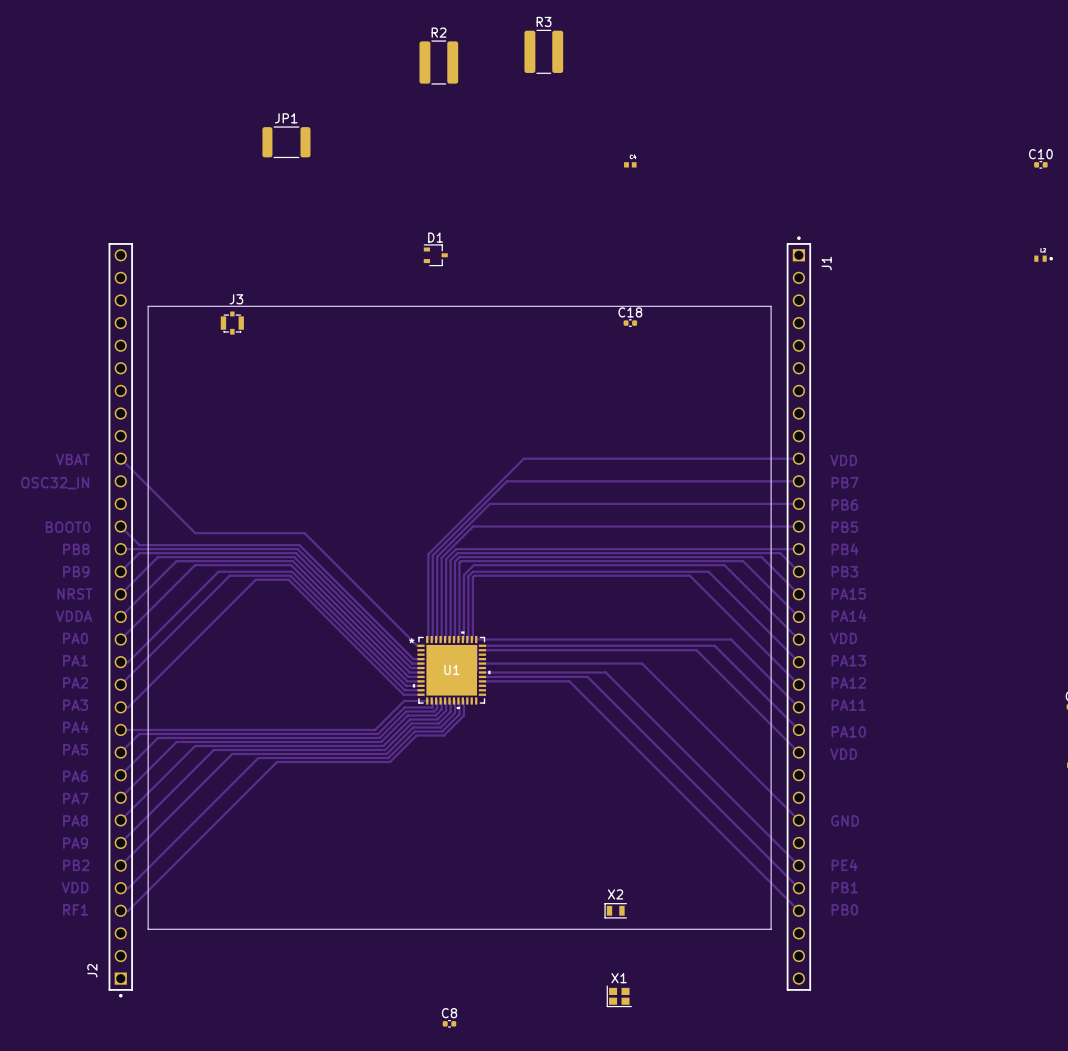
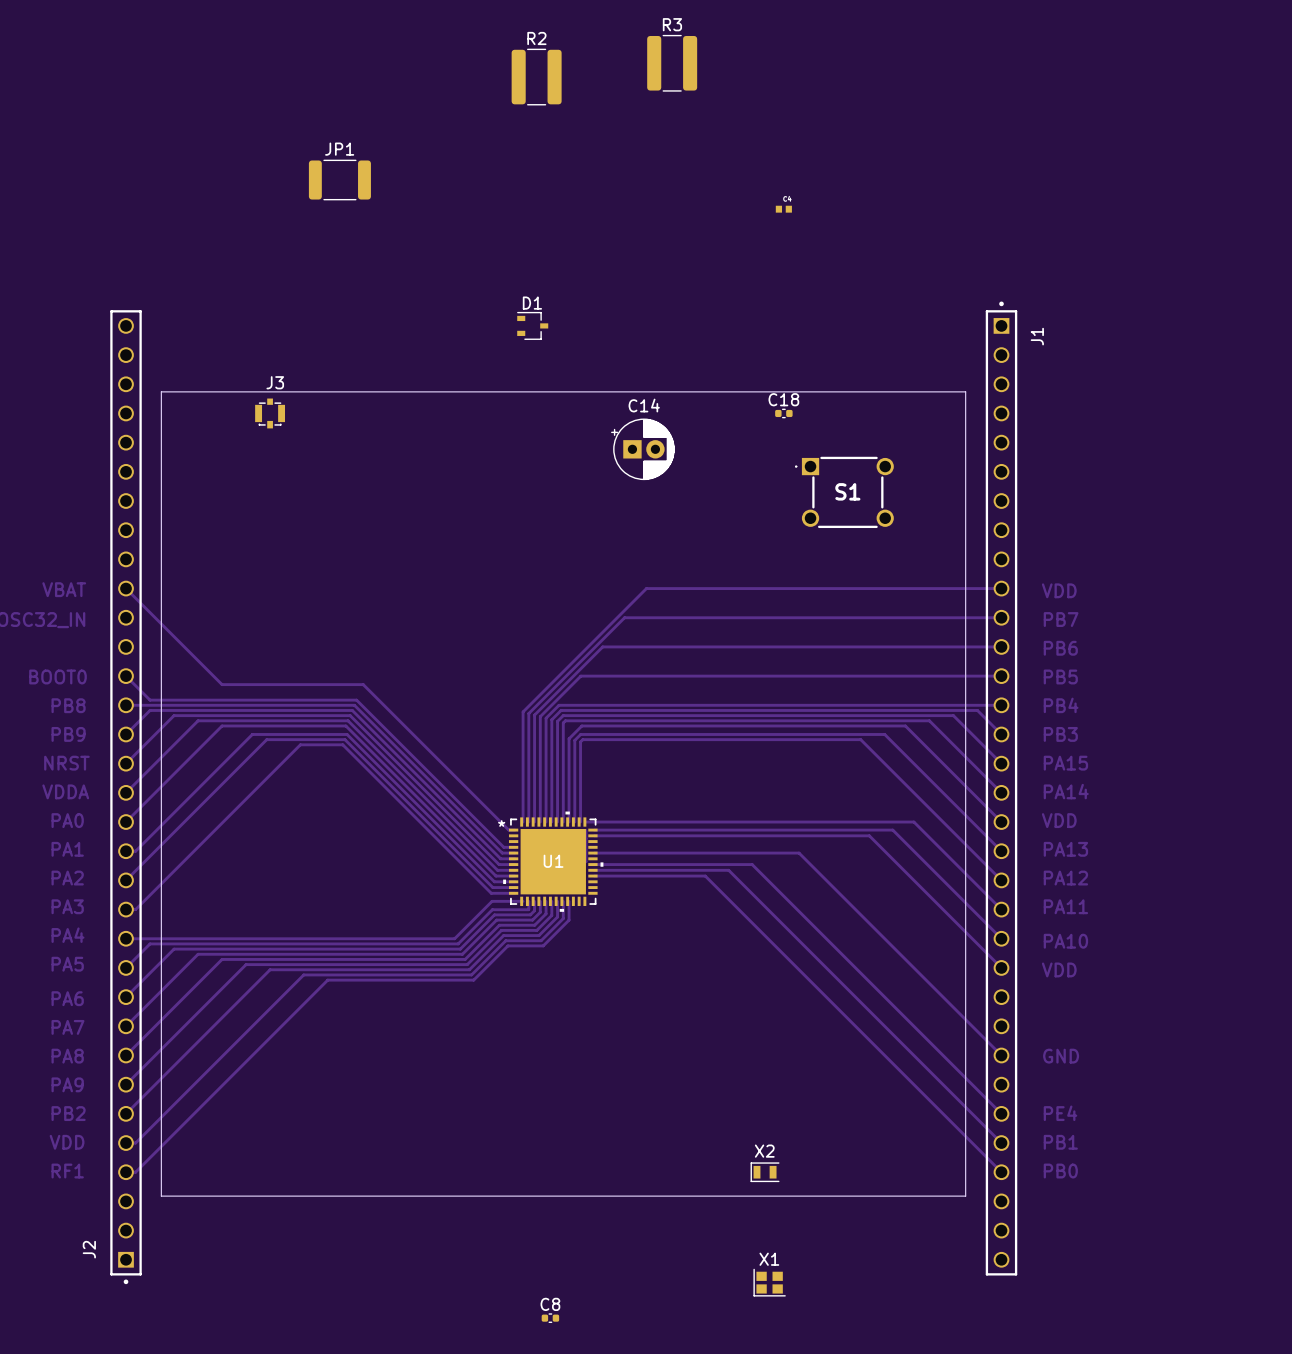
C14: none -> (642, 449)
S1: none -> (844, 492)

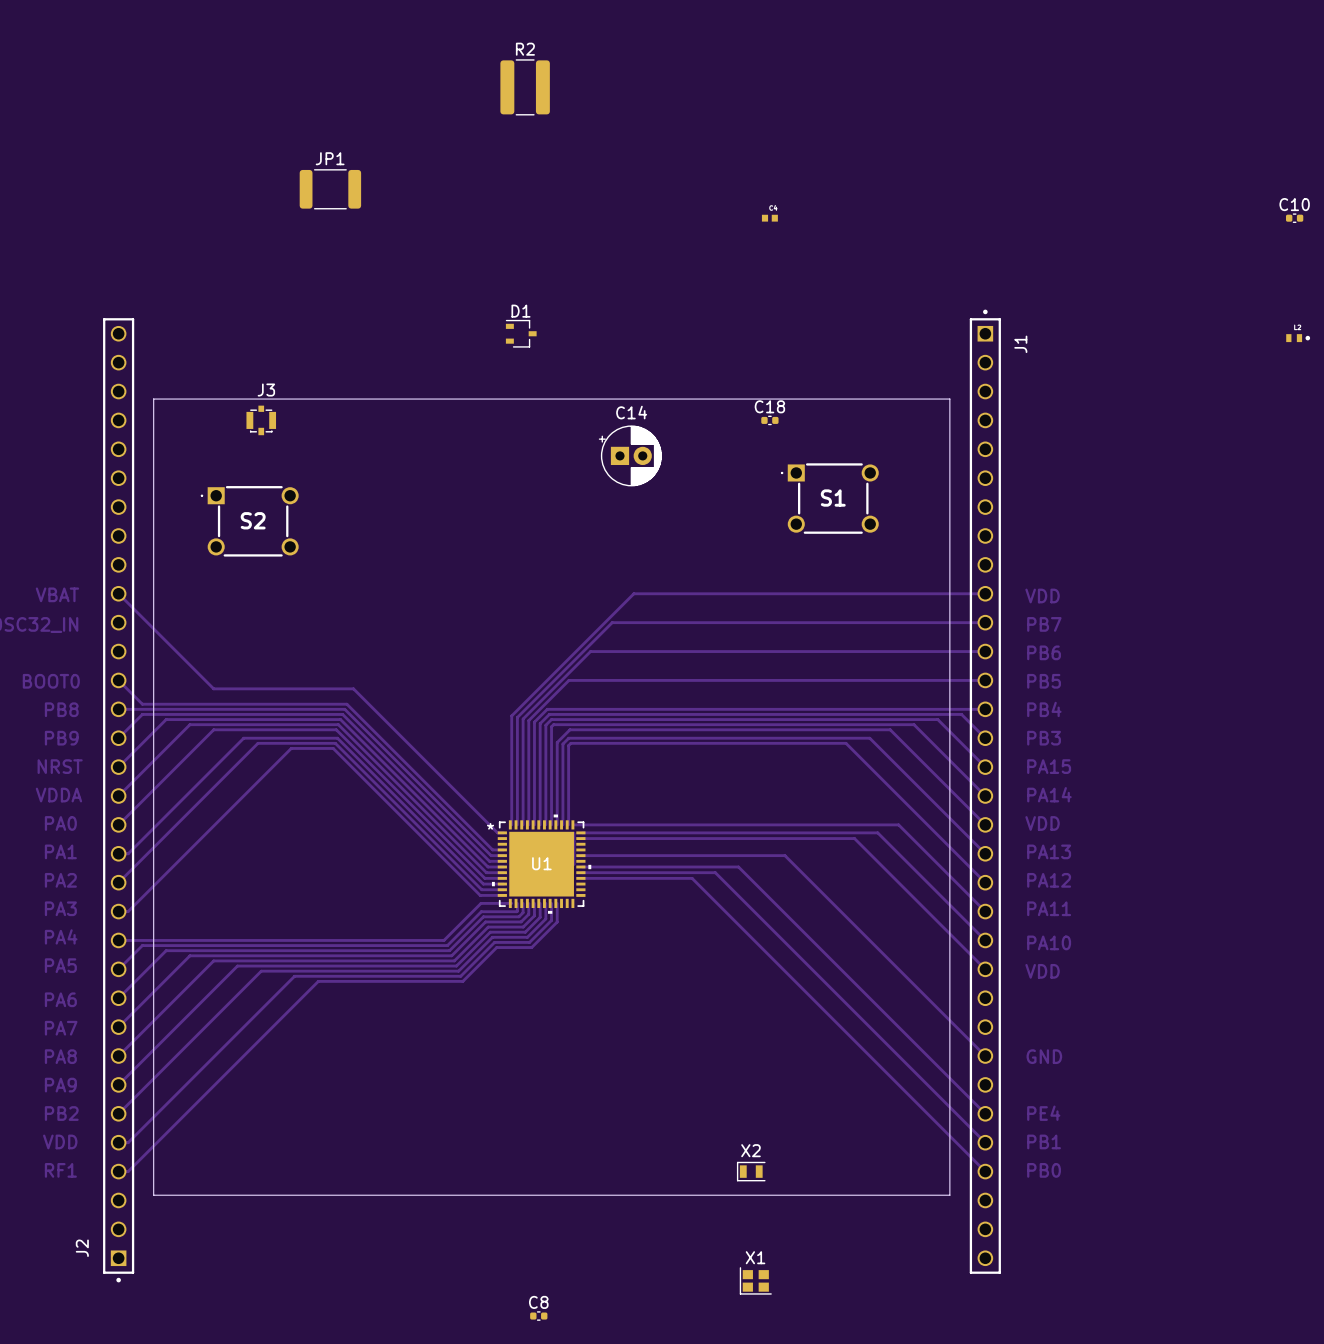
R3: (672, 63) -> none
S2: none -> (249, 521)

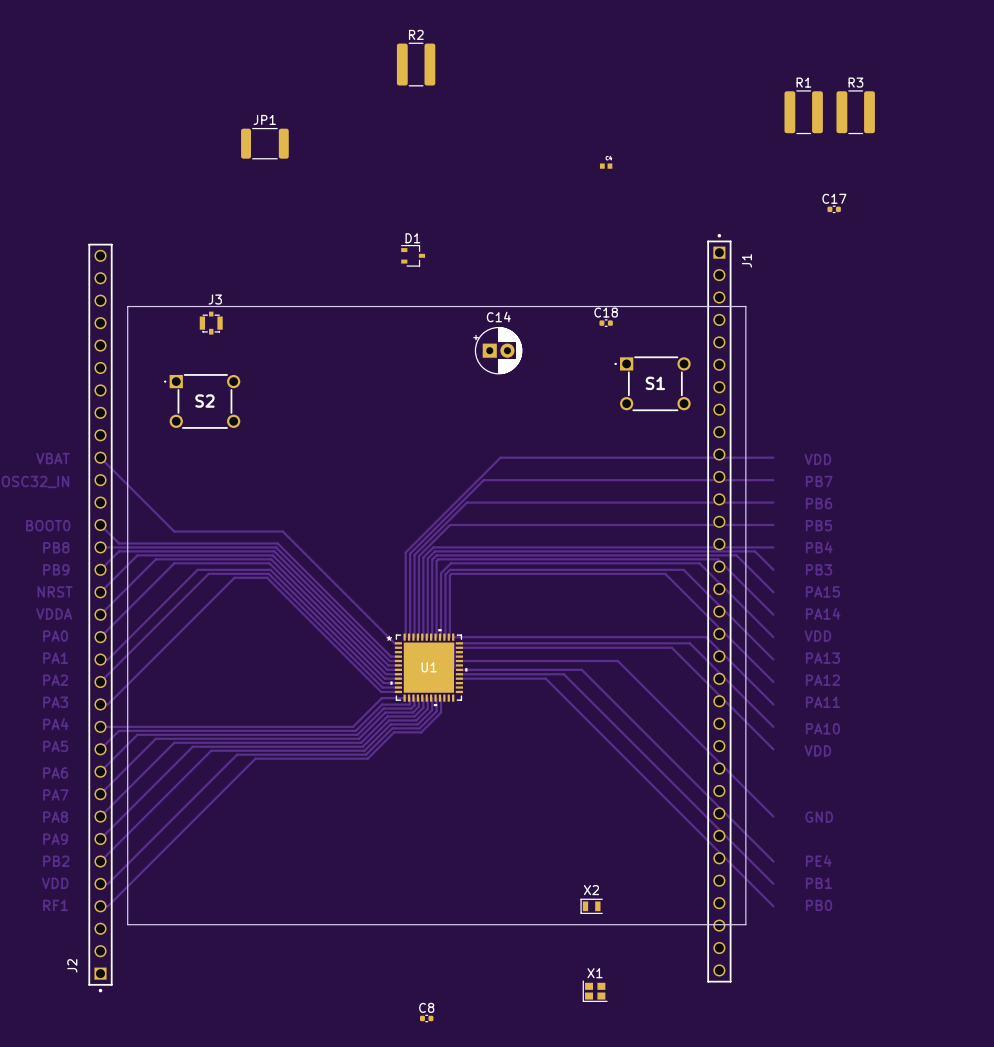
R1: none -> (803, 112)
R3: none -> (855, 112)
C17: none -> (834, 209)
J1 position: (985, 791) -> (719, 608)

